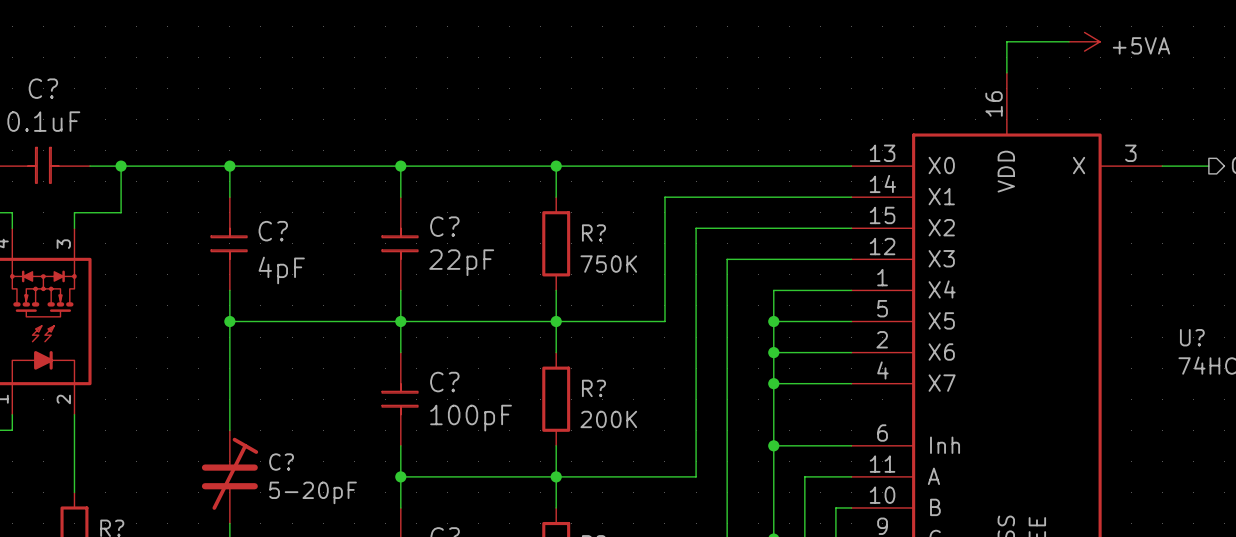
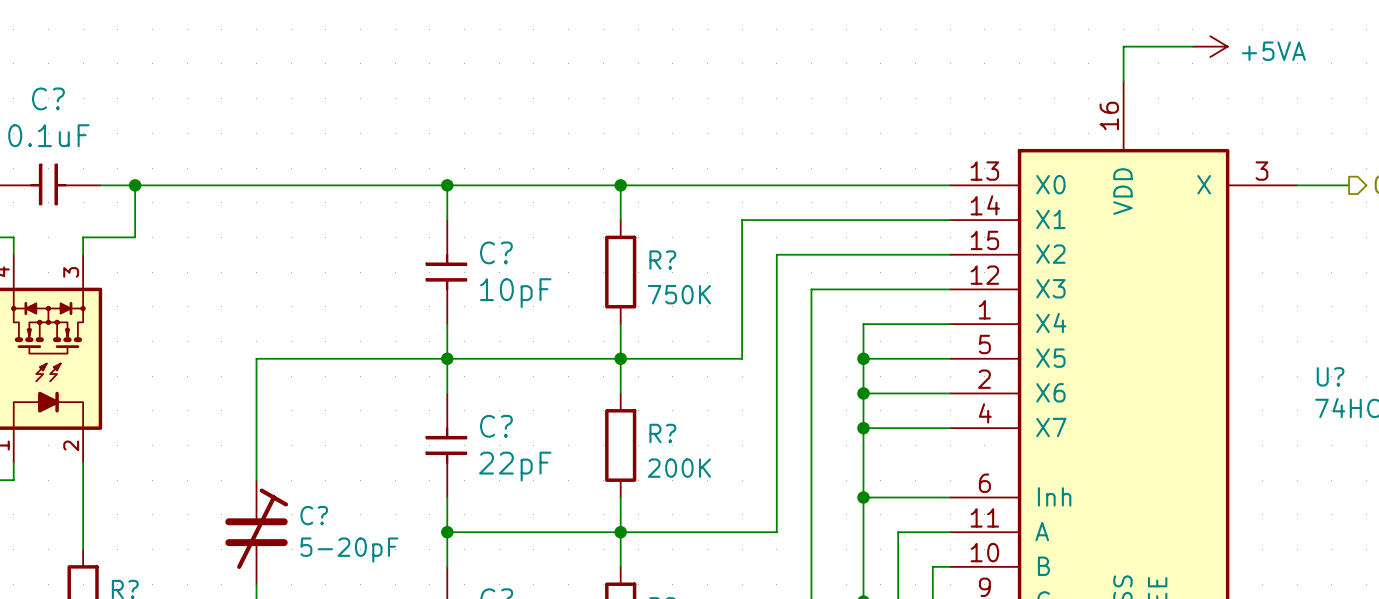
wire: (229, 166) (229, 197) -> none
junction: (229, 166) -> none
C?: 4pF (229, 243) -> none
C? value: 22pF (461, 262) -> 10pF (515, 293)
wire: (229, 290) (229, 321) -> none
junction: (229, 321) -> none
C? value: 100pF (471, 418) -> 22pF (515, 466)

